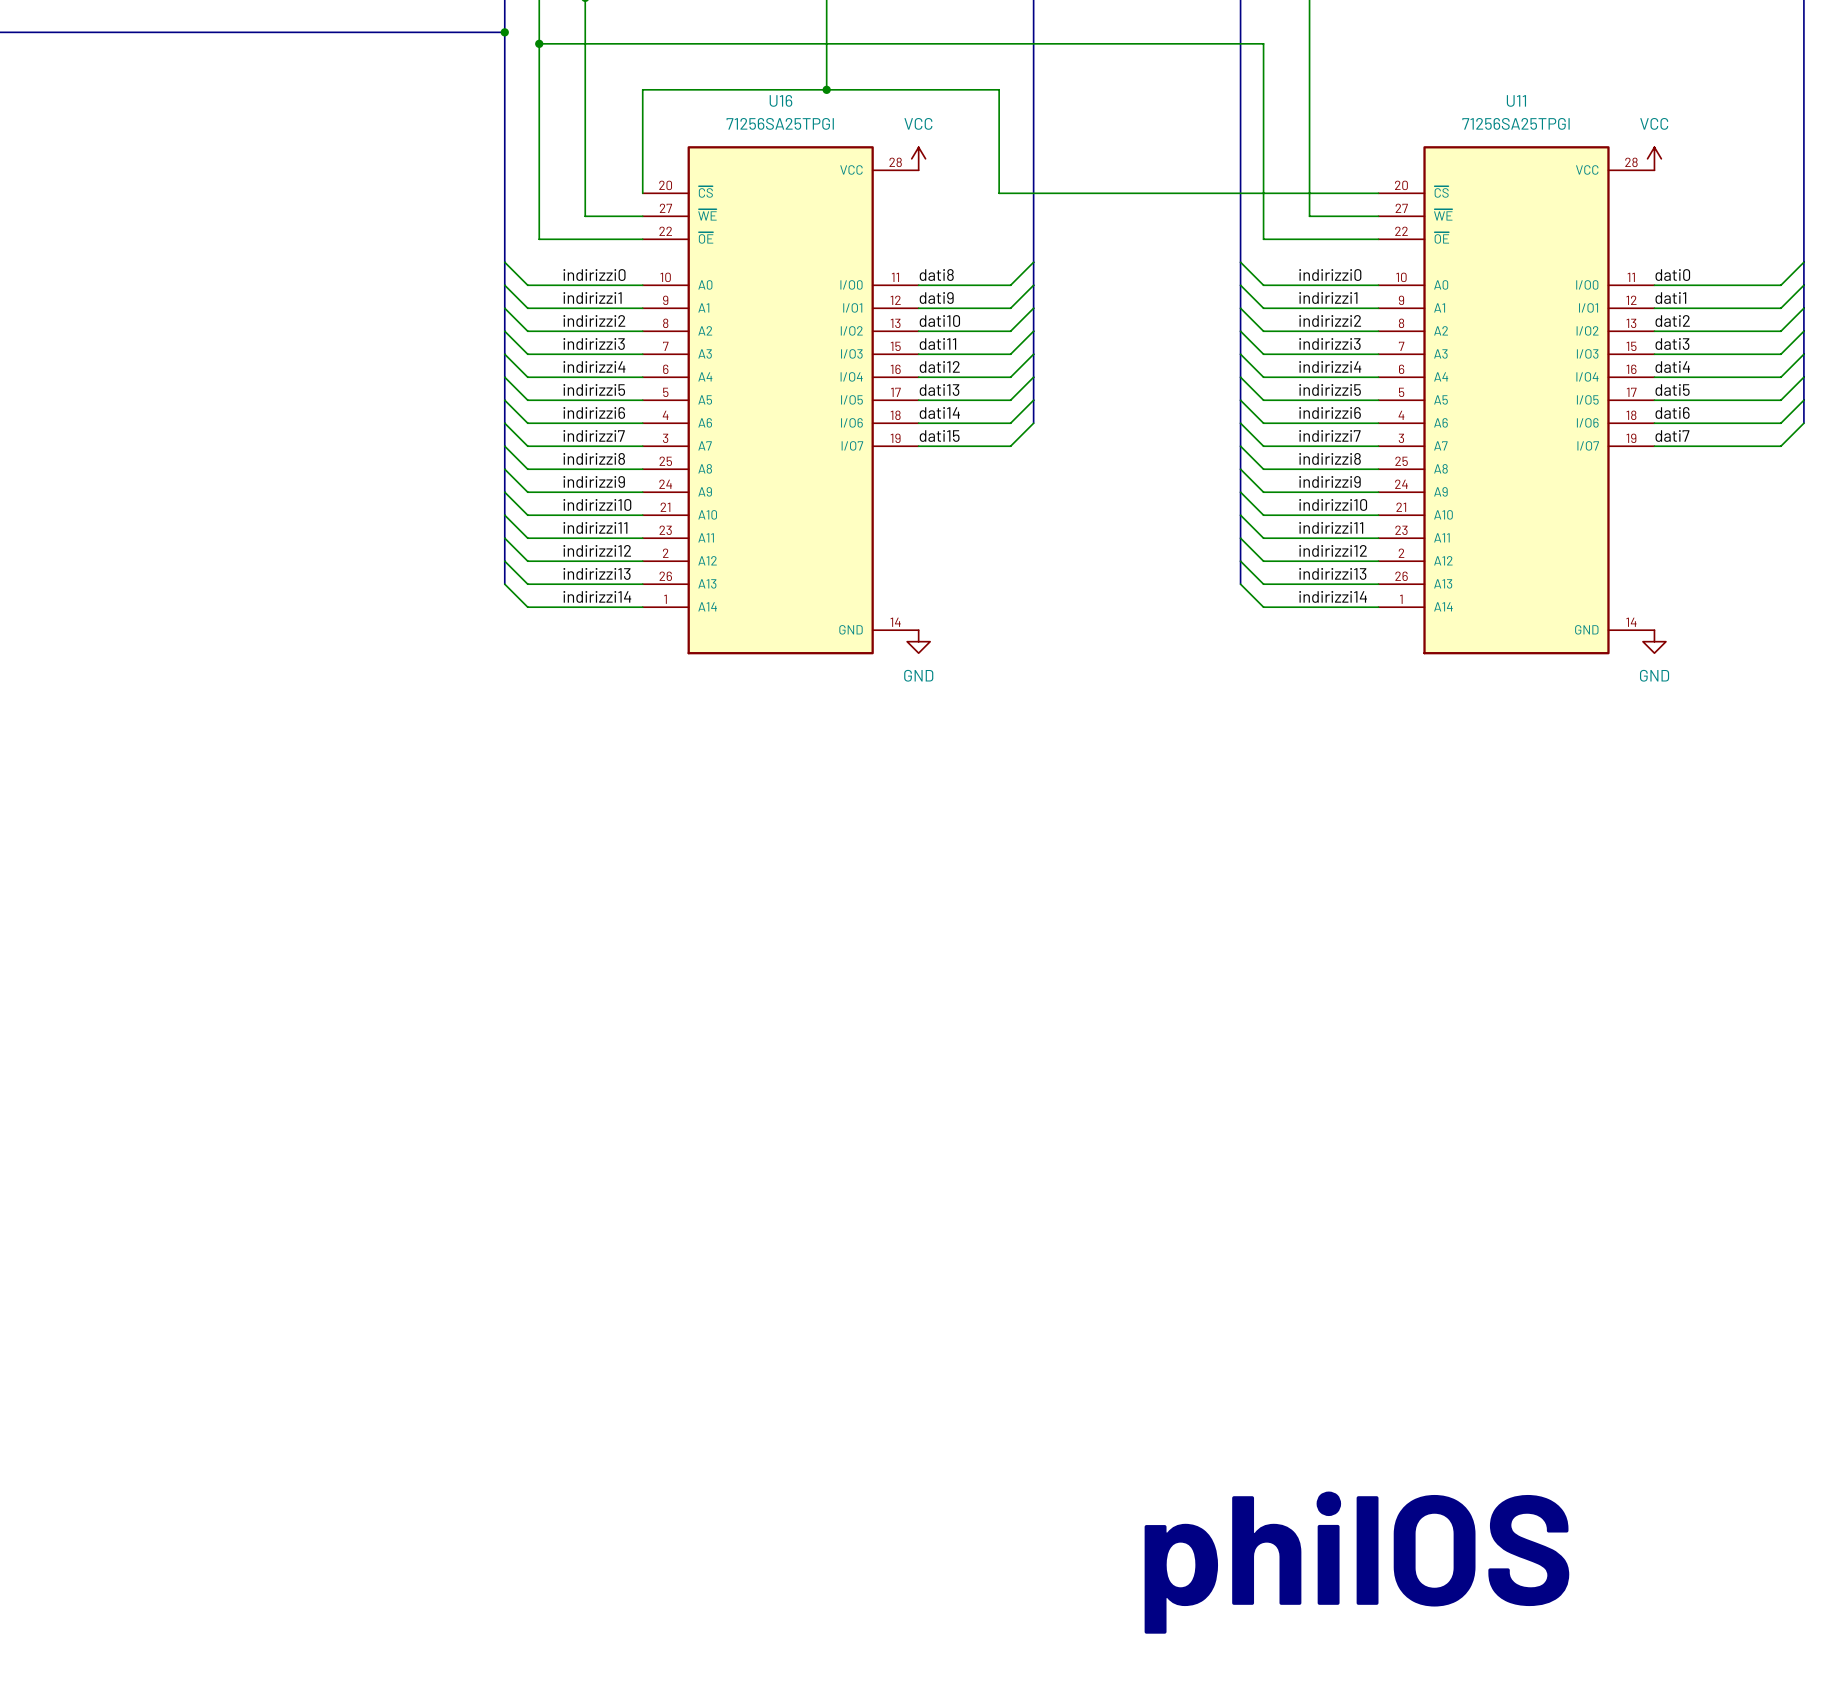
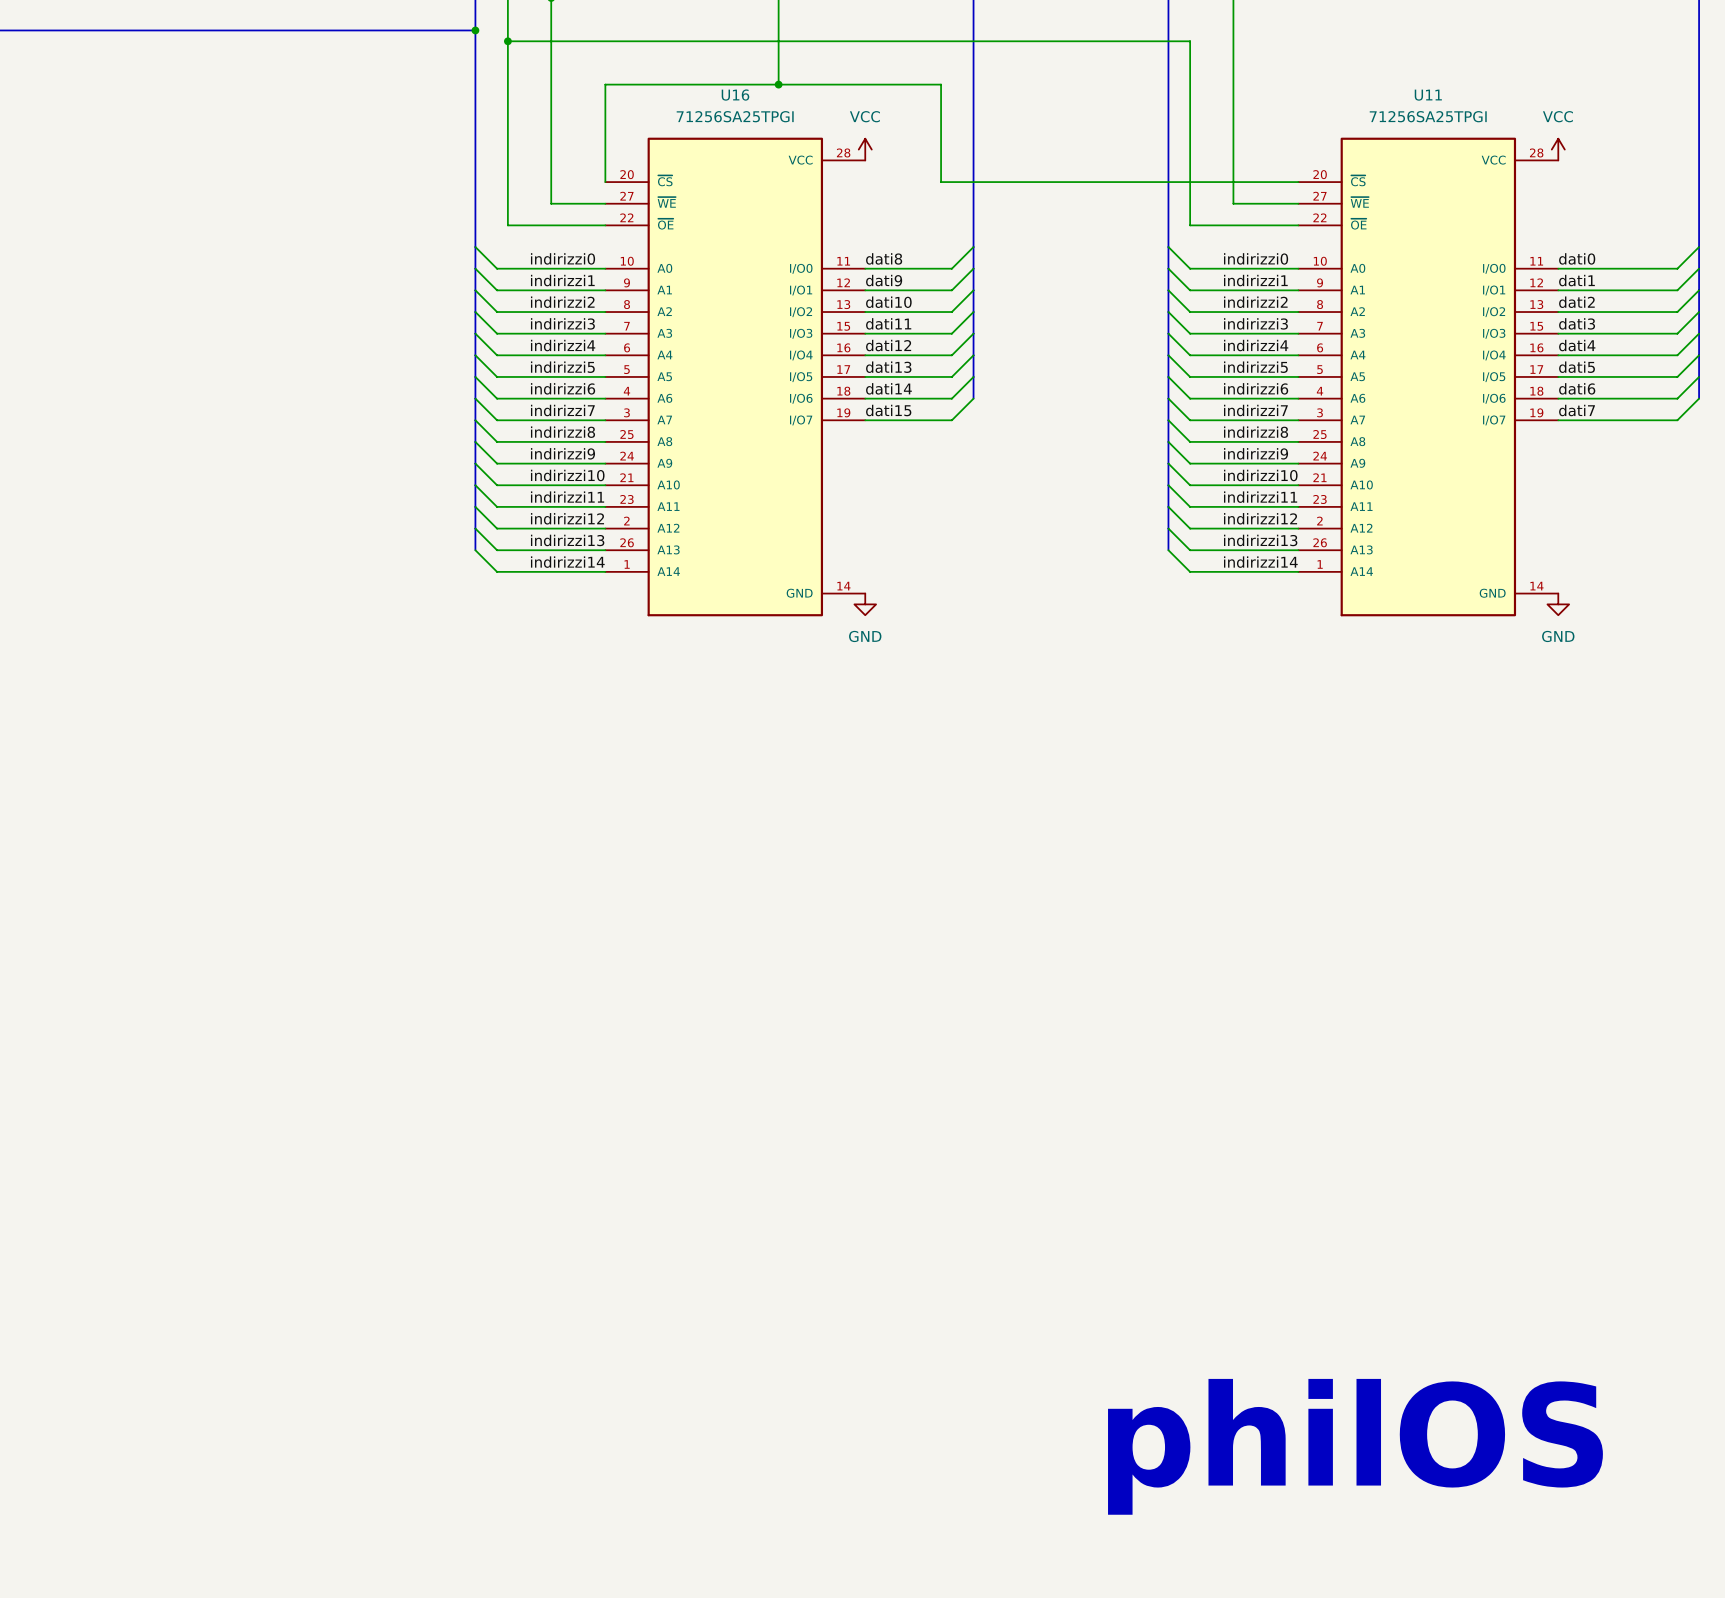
text position: philOS (1356, 1562) -> philOS (1355, 1446)

